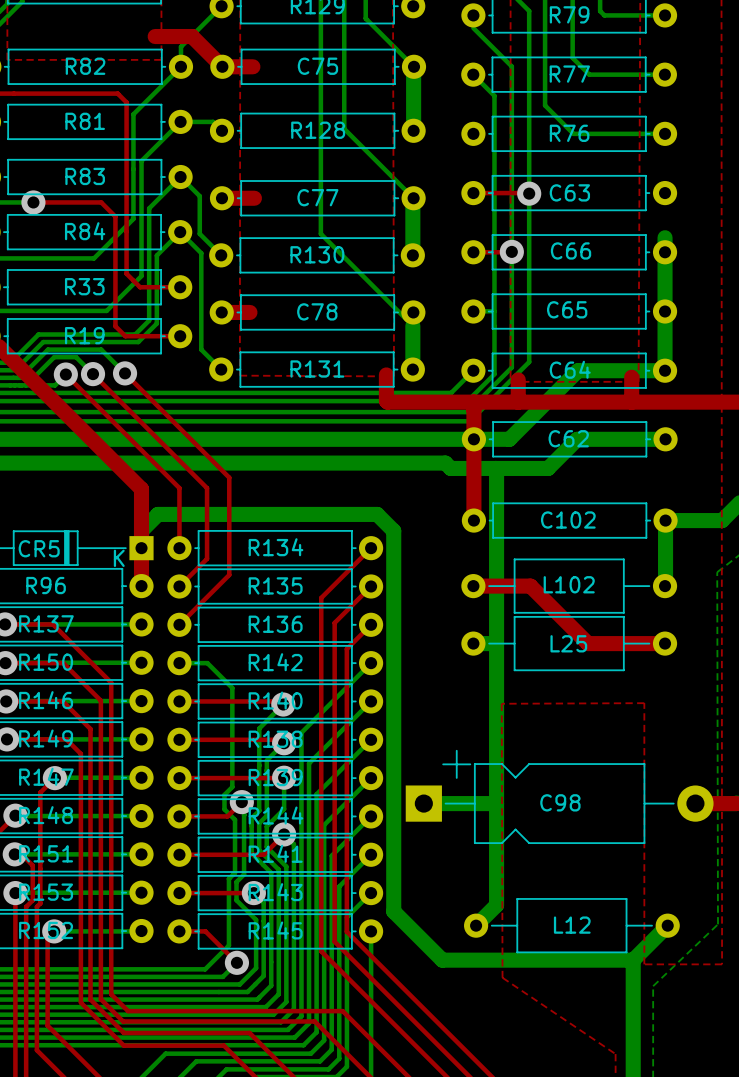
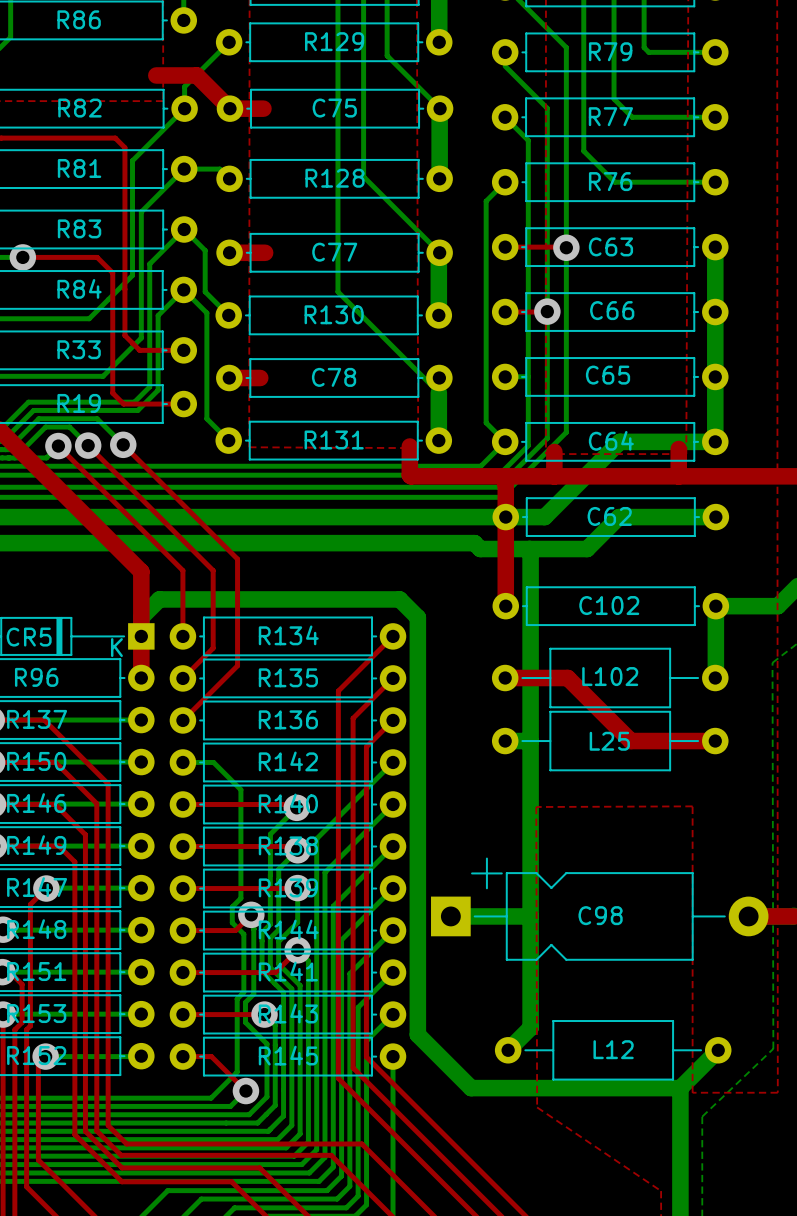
bottom track: none -> (505, 182) (486, 201) (486, 422) (505, 441)
bottom track: none -> (715, 247) (715, 296)

